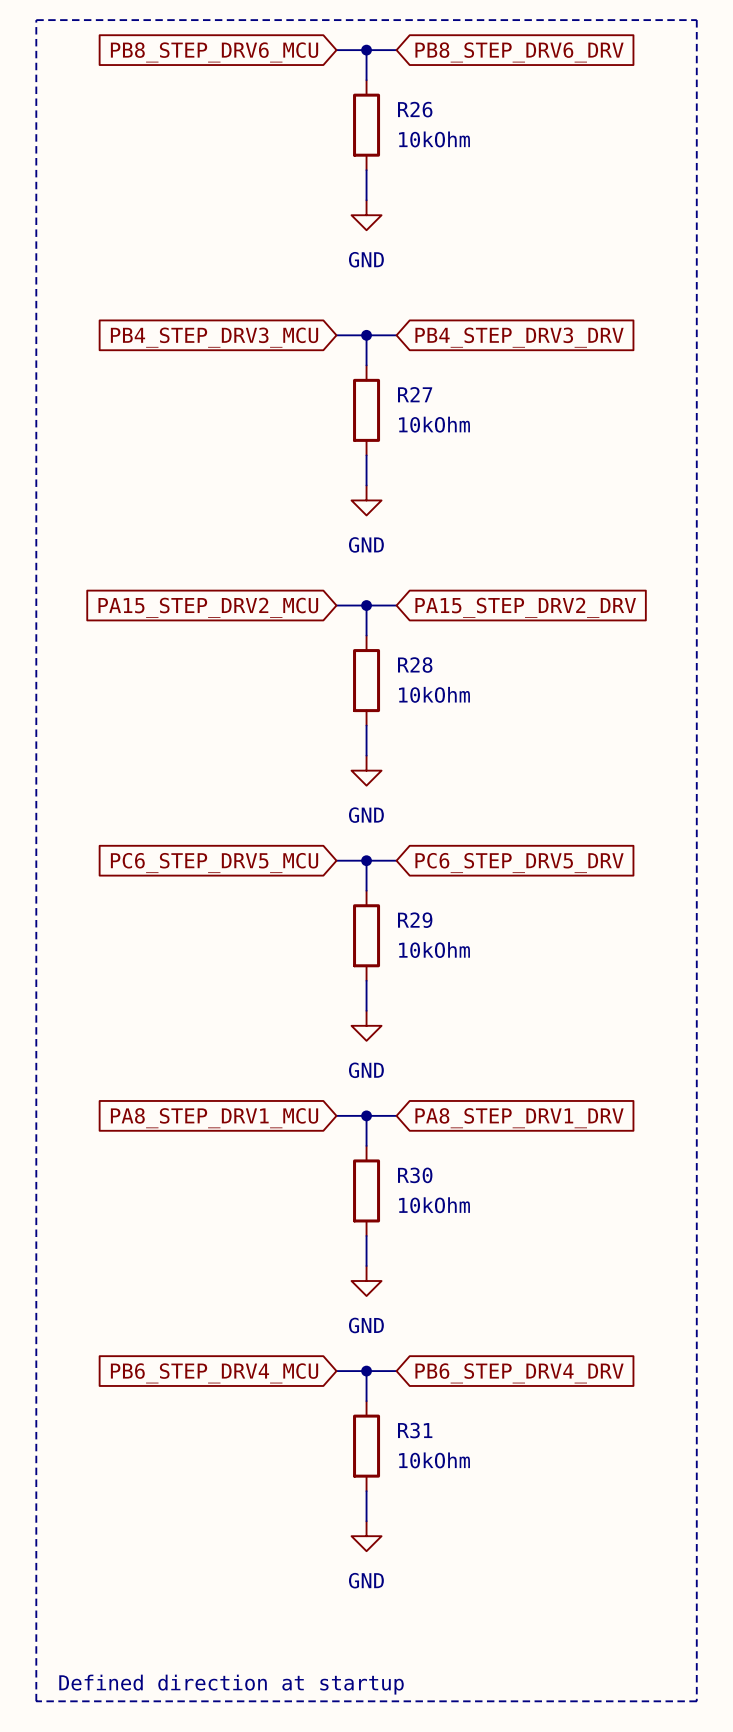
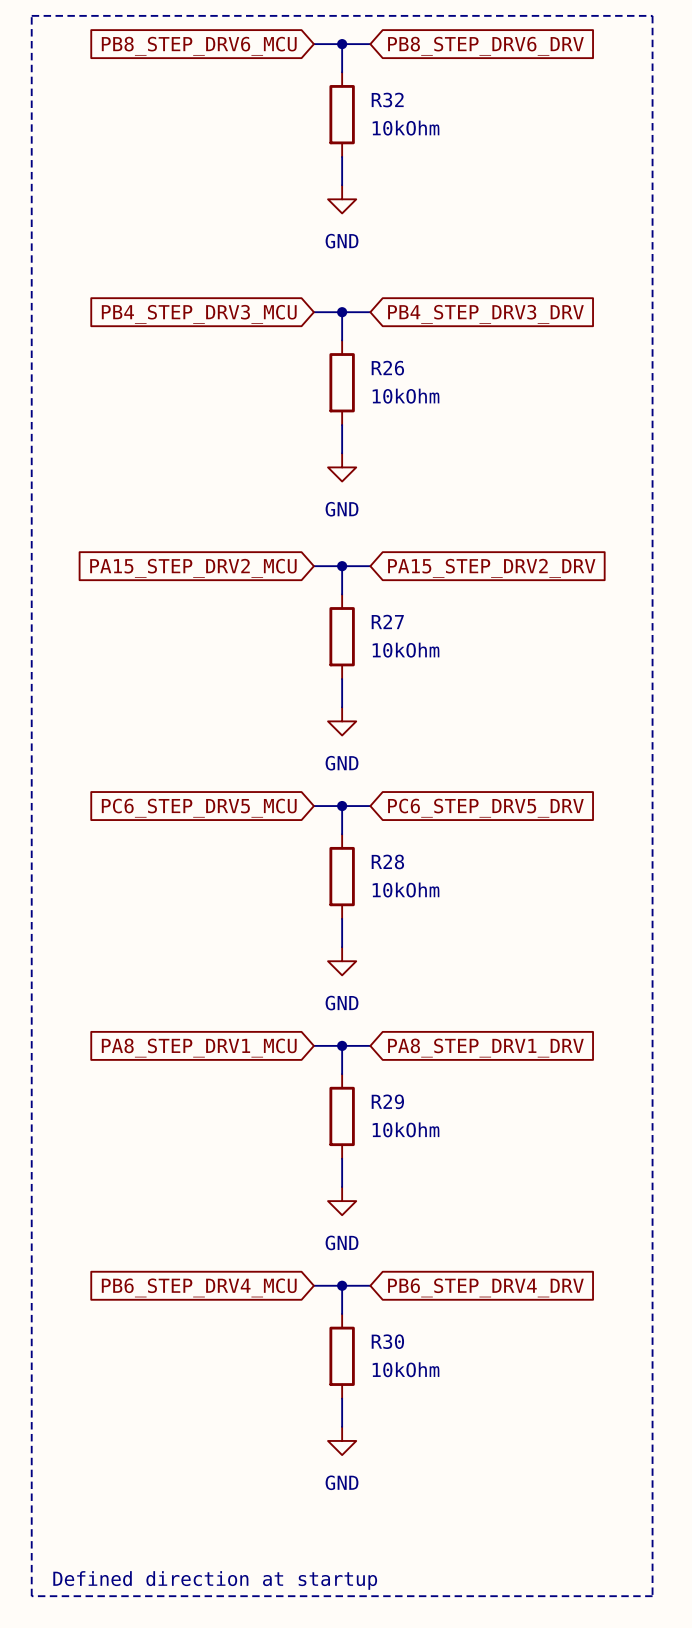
R26 name: R26 (415, 109) -> R32 (387, 100)
R27 name: R27 (415, 394) -> R26 (387, 368)
R28 name: R28 (415, 665) -> R27 (387, 621)
R29 name: R29 (415, 920) -> R28 (387, 861)
R30 name: R30 (415, 1175) -> R29 (387, 1101)
R31 name: R31 (415, 1430) -> R30 (387, 1341)

